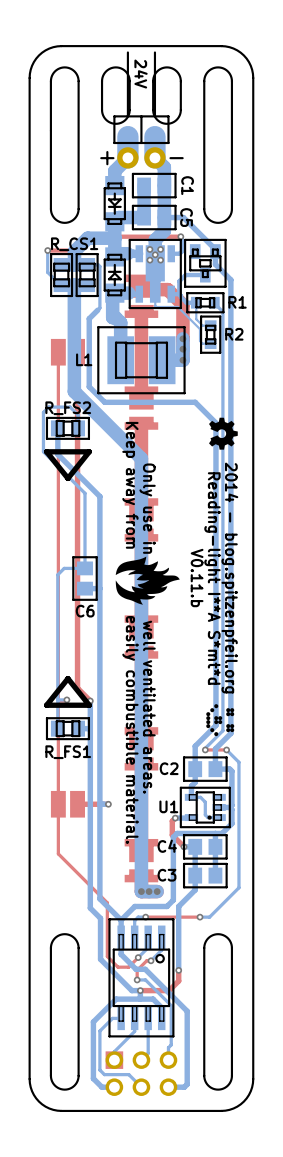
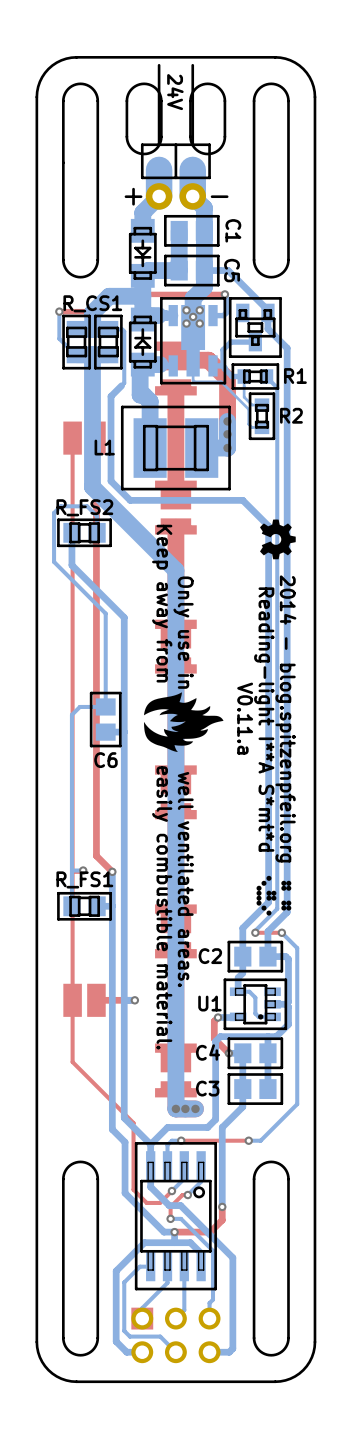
line: (89, 451) (67, 478) (46, 451) (89, 451) -> none
text: V0.11.b (197, 578) -> V0.11.a (245, 718)
line: (67, 678) (89, 705) (46, 705) (67, 678) -> none
R_FS1 name position: R_FS1 (68, 752) -> R_FS1 (84, 879)

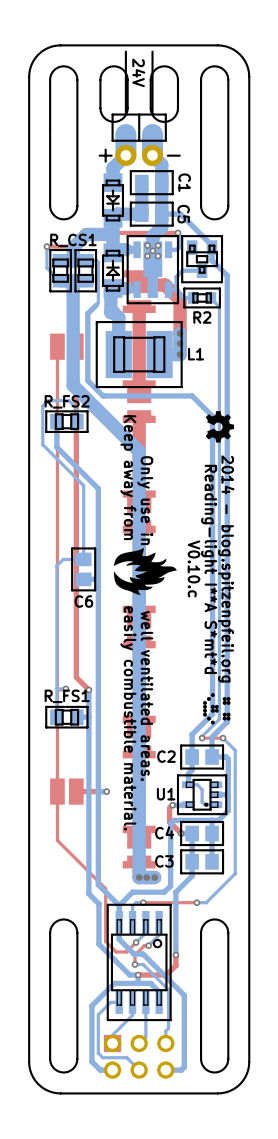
bottom track: (193, 361) (194, 381) (221, 381) (248, 409) (248, 424) (252, 427) (262, 427) -> none
bottom track: (244, 376) (244, 397) (252, 405) (262, 405) -> none
R1 name: R1 (295, 376) -> R2 (202, 317)
R2: (262, 416) -> none
L1 name position: L1 (104, 447) -> L1 (196, 354)
text: V0.11.a (245, 718) -> V0.10.c (193, 568)

